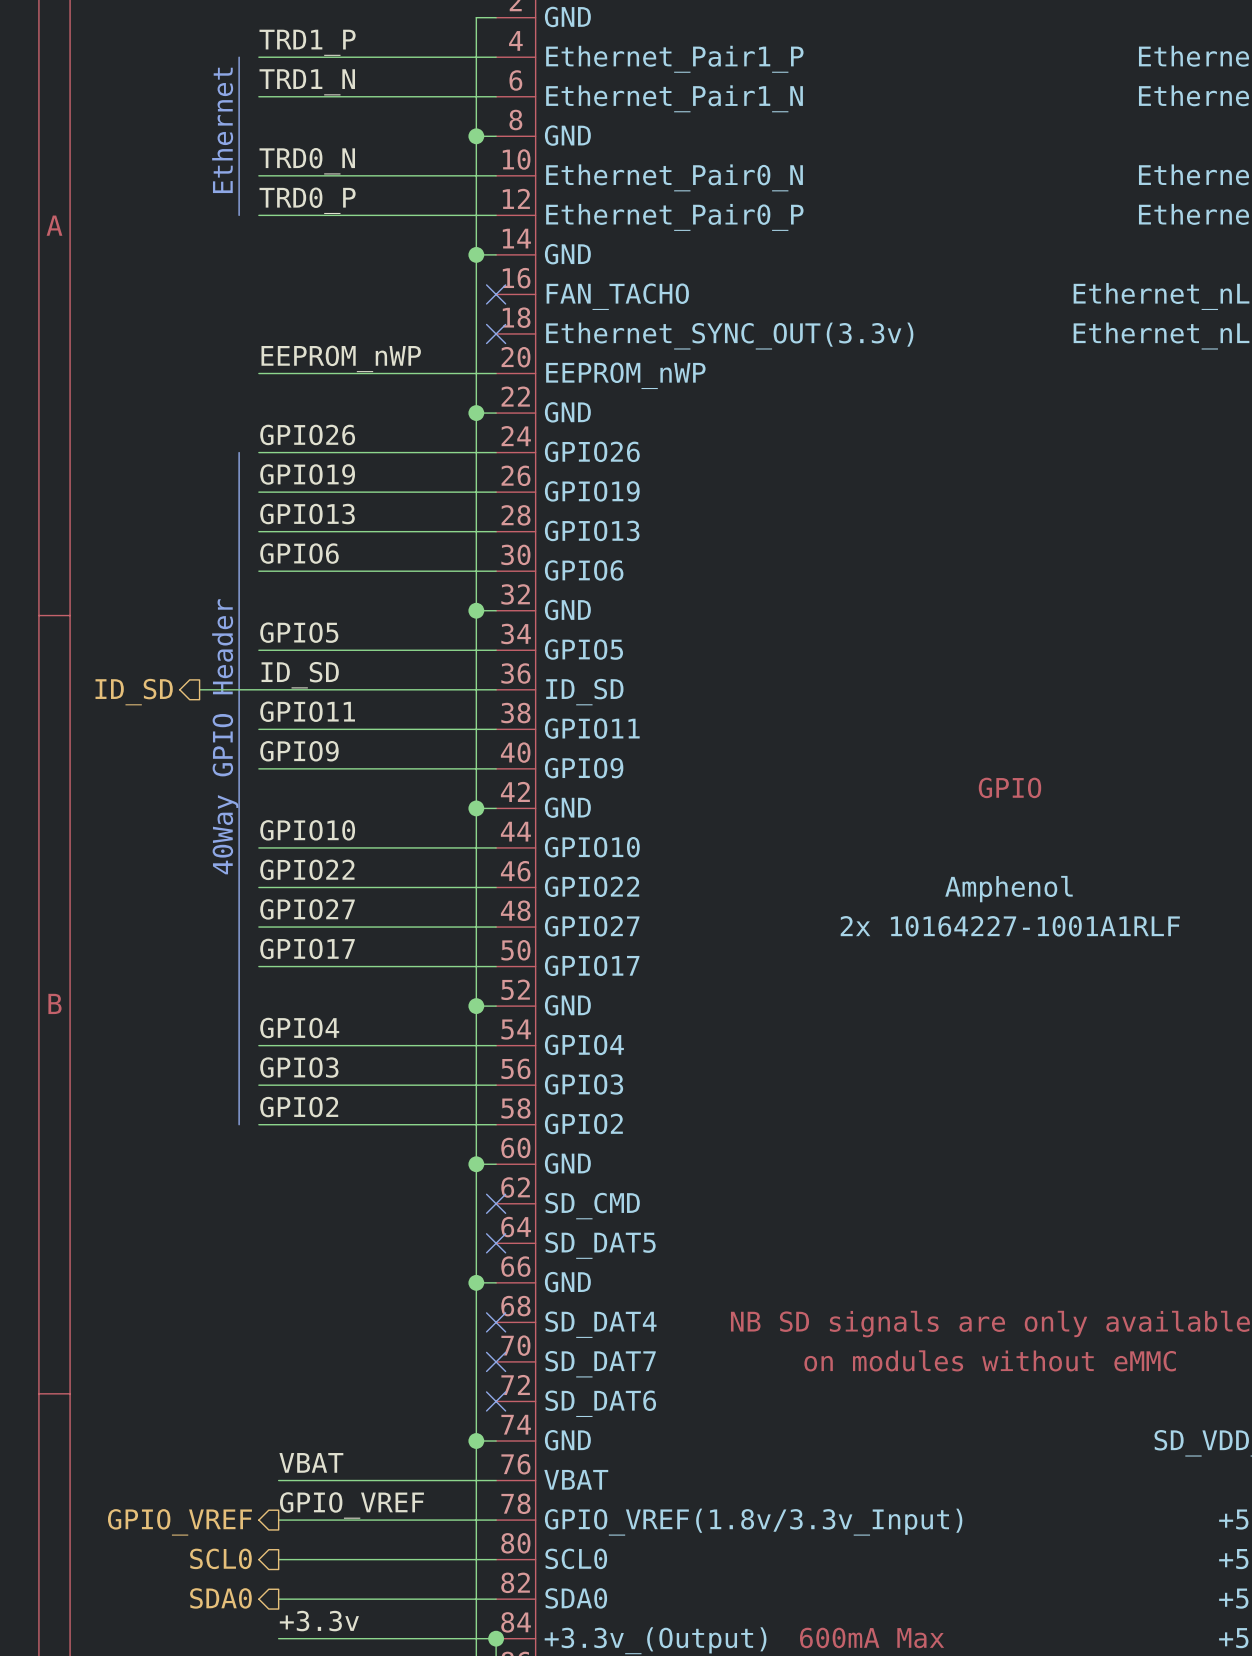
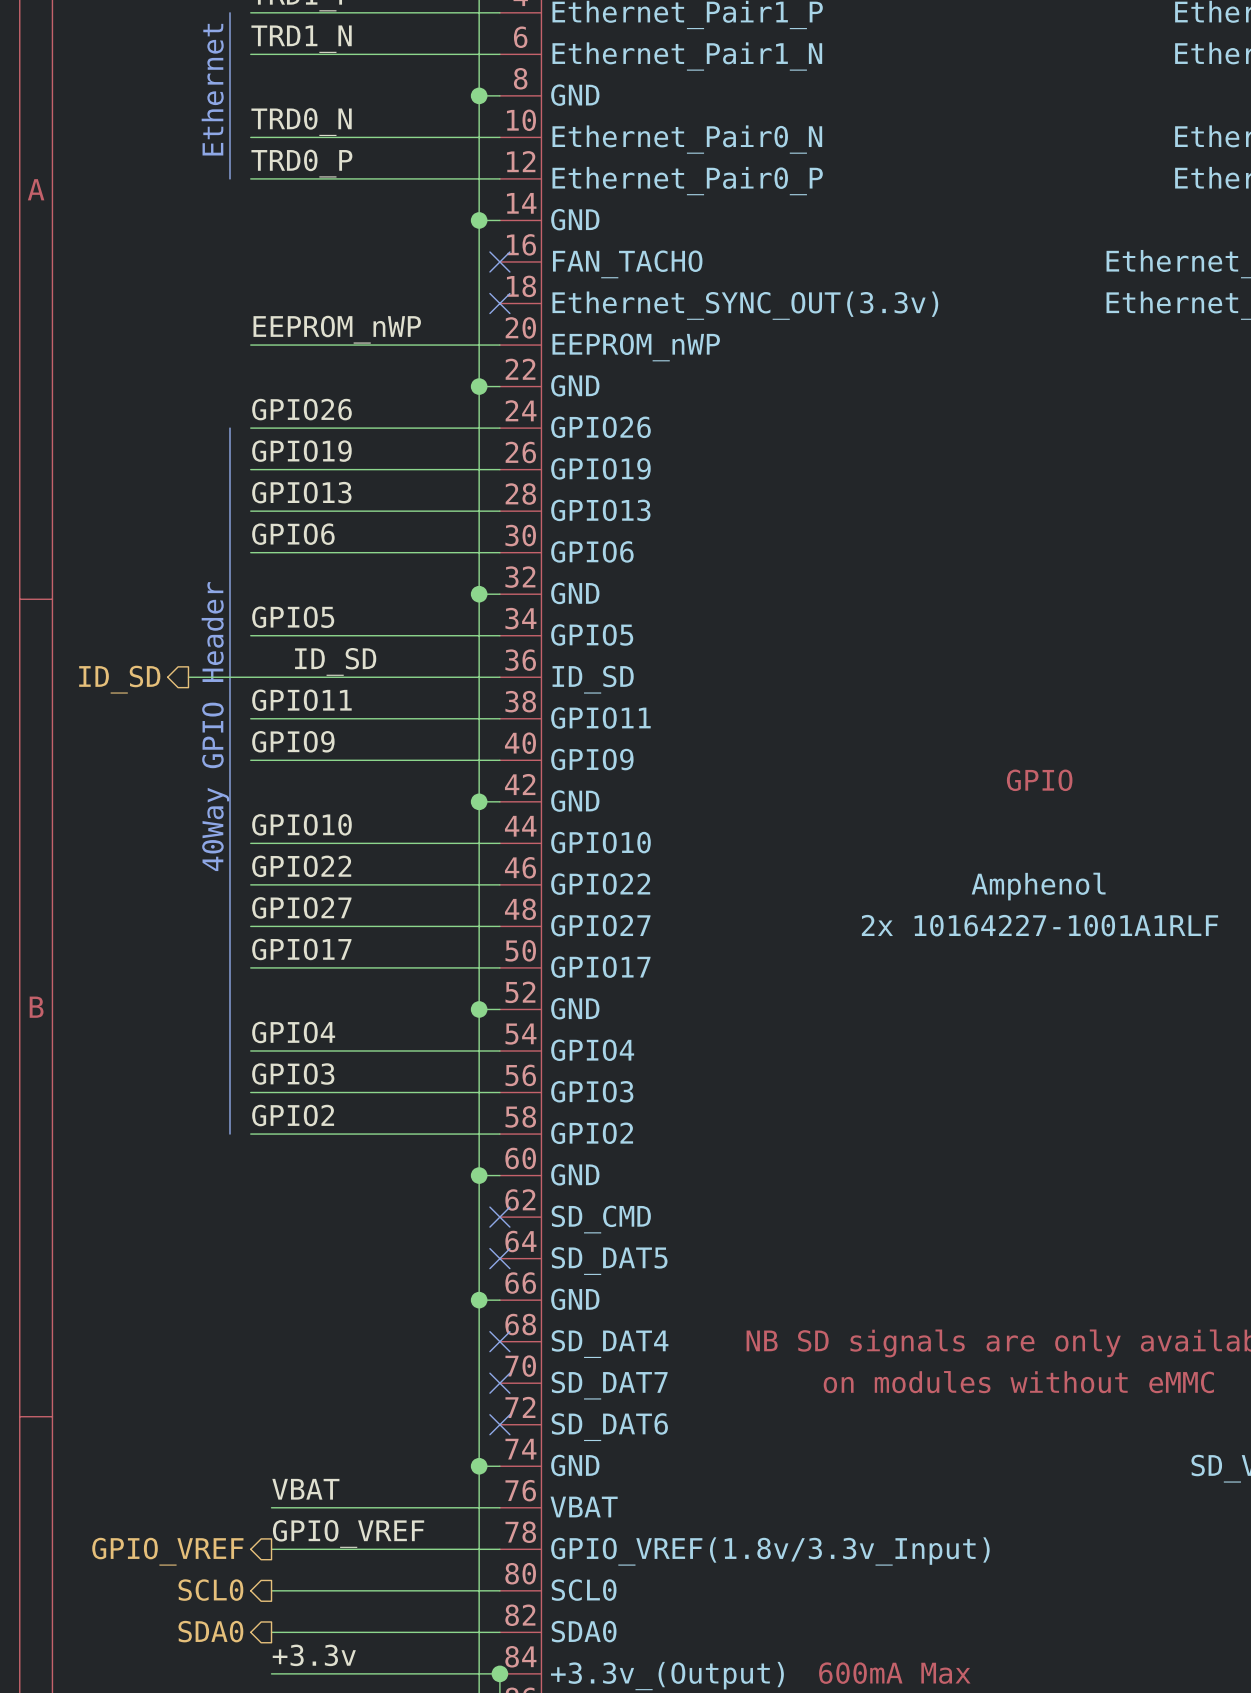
label position: ID_SD (300, 675) -> ID_SD (335, 661)

